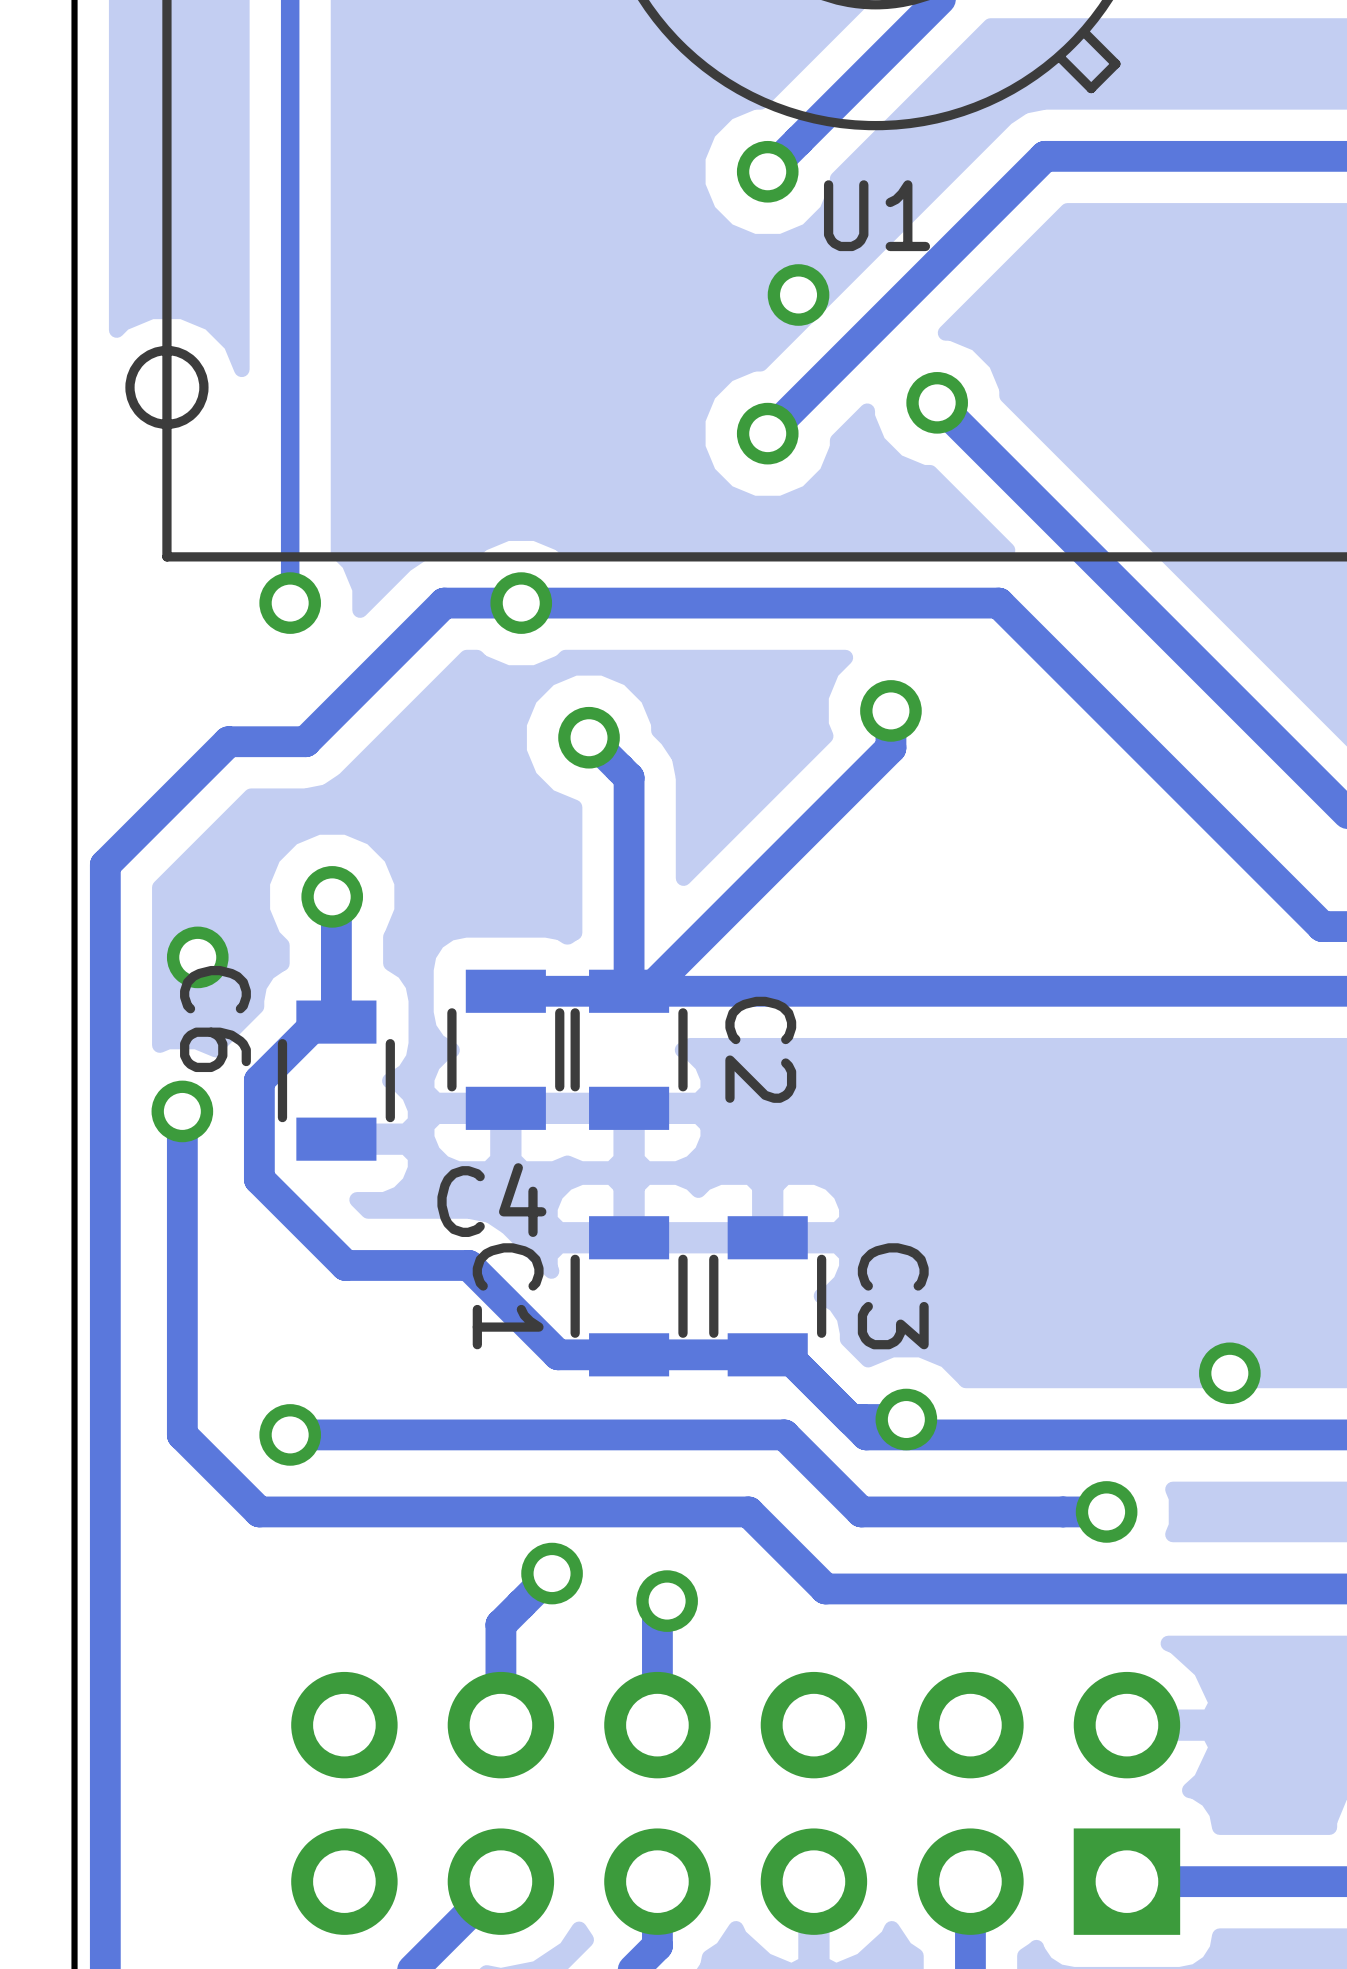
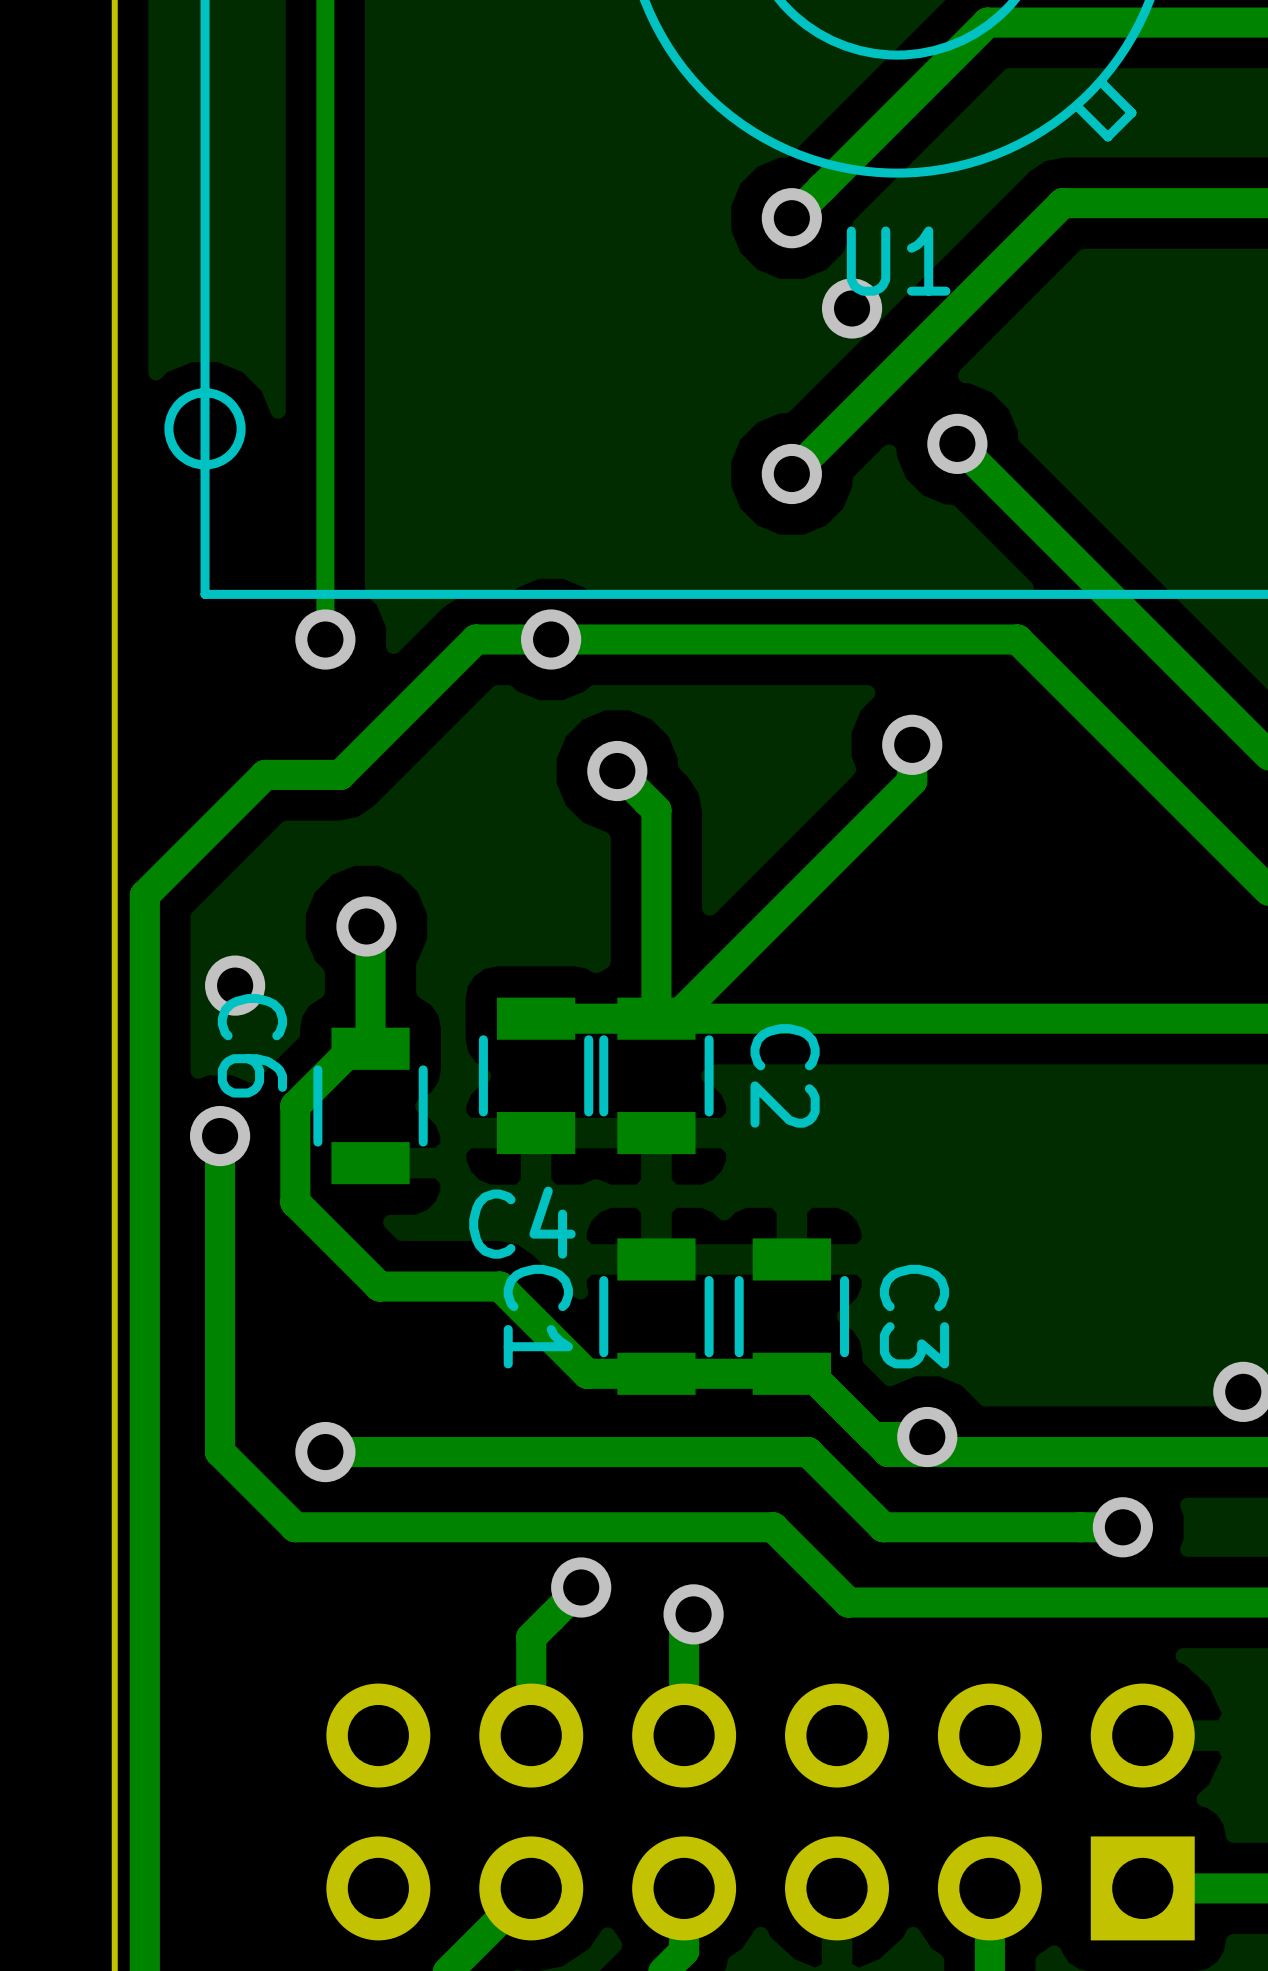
via position: (798, 295) -> (852, 308)

